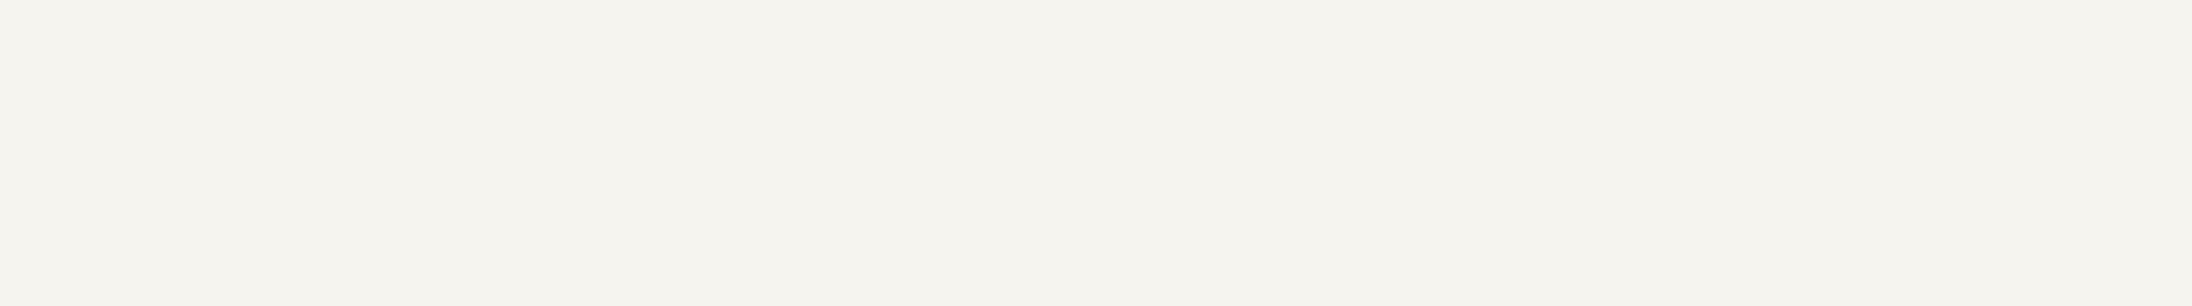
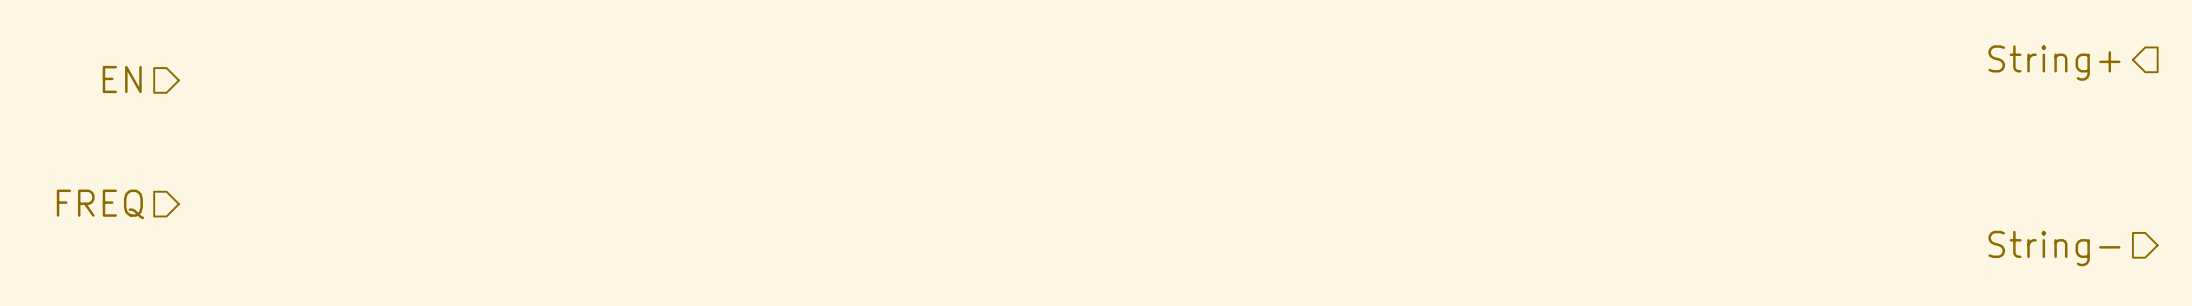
hierarchical label: none -> String+ (2054, 63)
hierarchical label: none -> EN (122, 79)
hierarchical label: none -> FREQ (100, 204)
hierarchical label: none -> String- (2054, 248)

